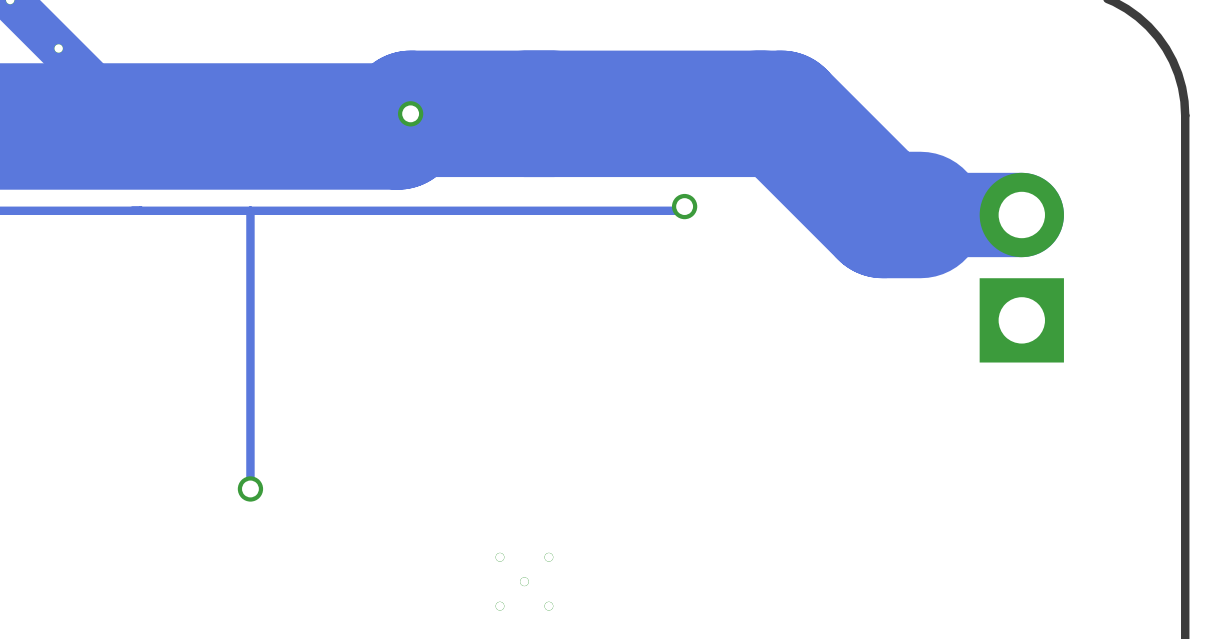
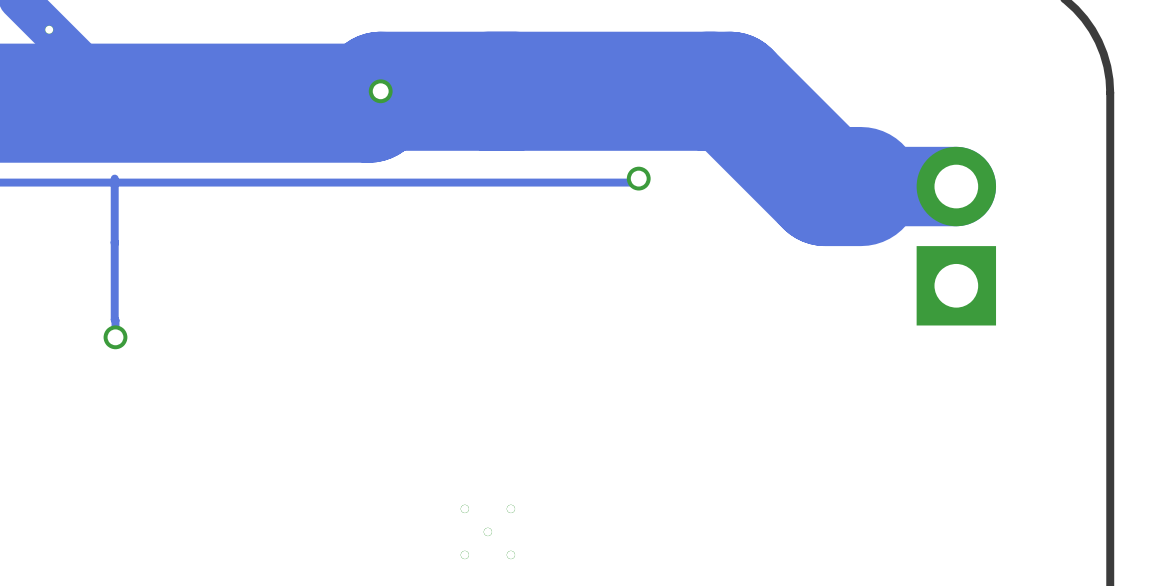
track: none -> (114, 178) (115, 337)
track: (250, 210) (250, 488) -> none
via position: (250, 488) -> (115, 337)

